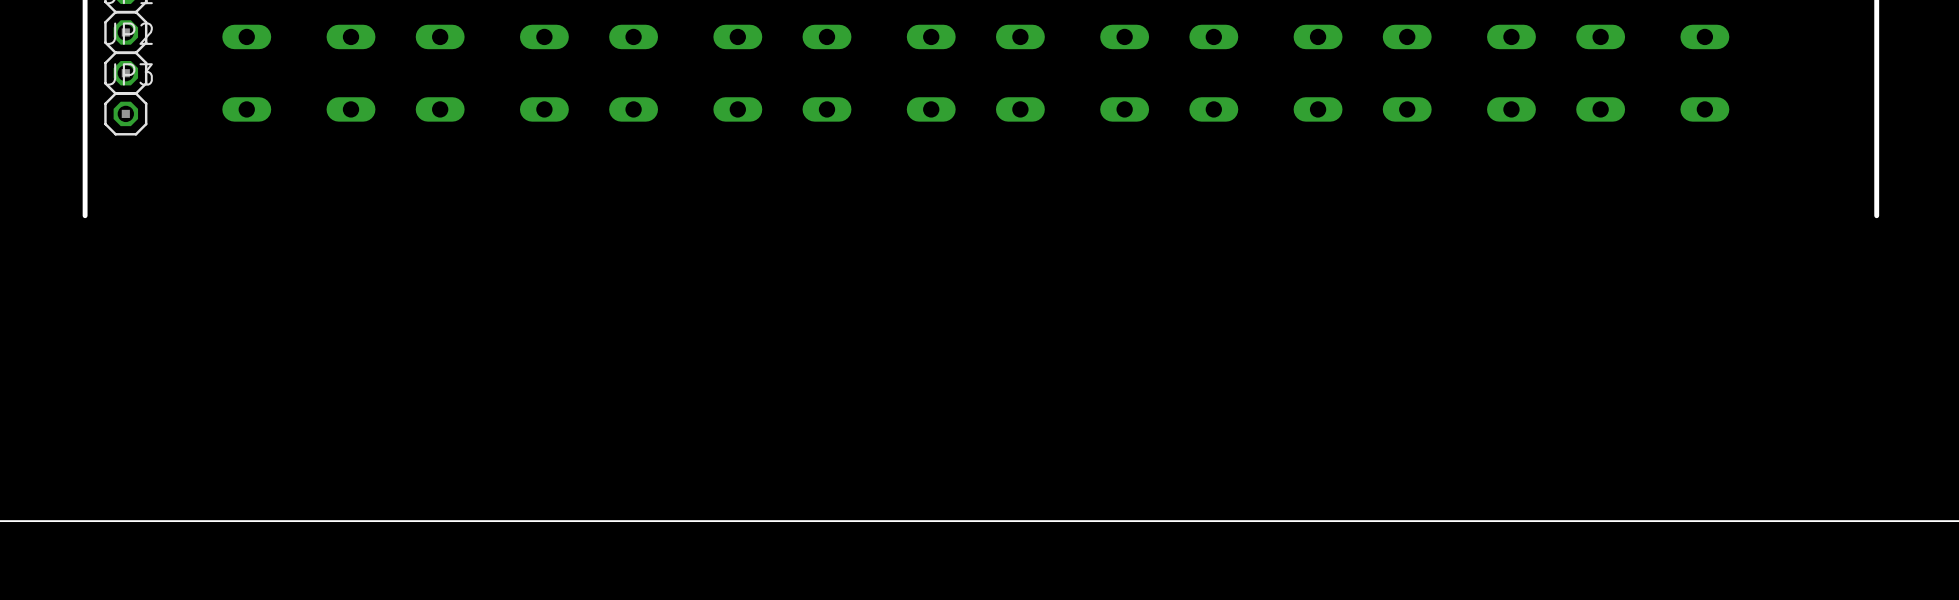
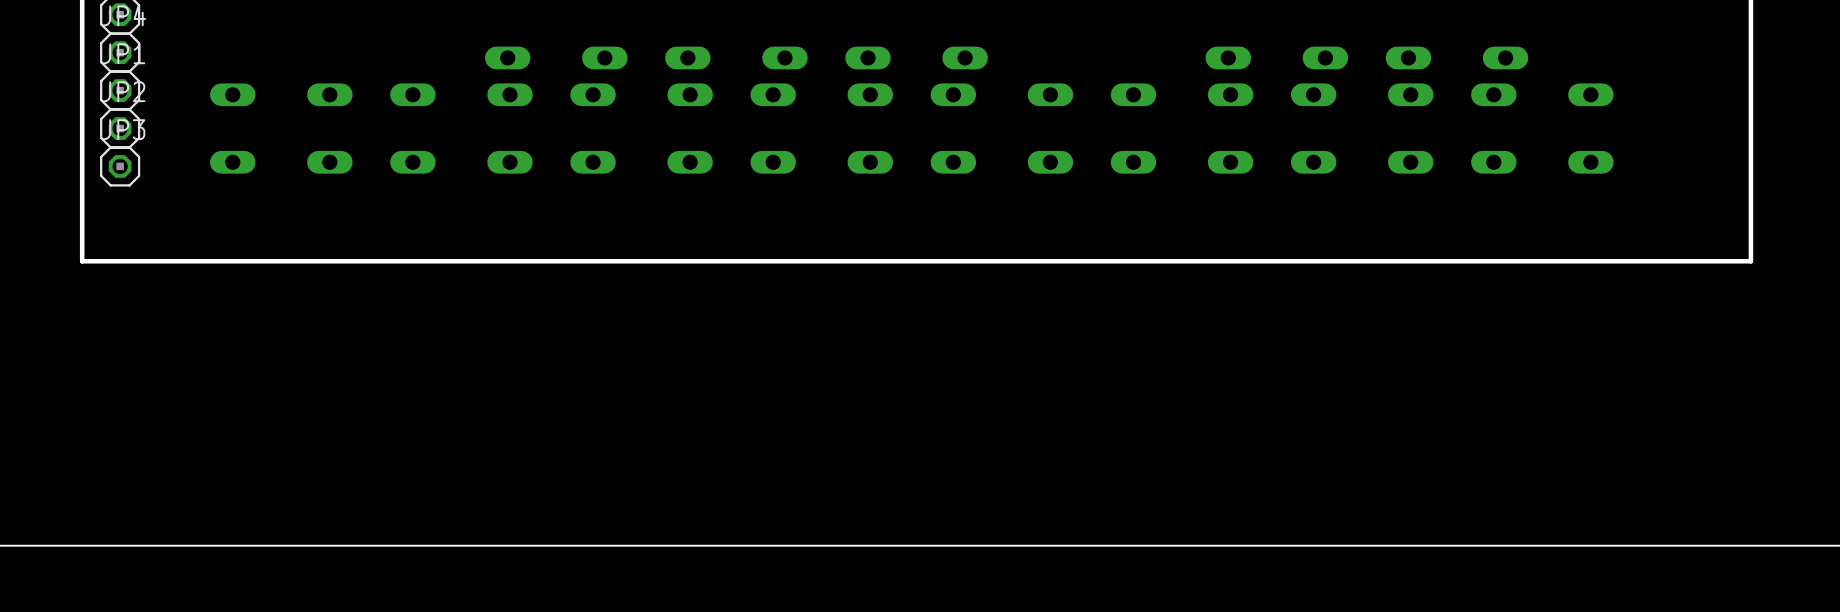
board edge: none -> (82, 261) (1750, 261)

